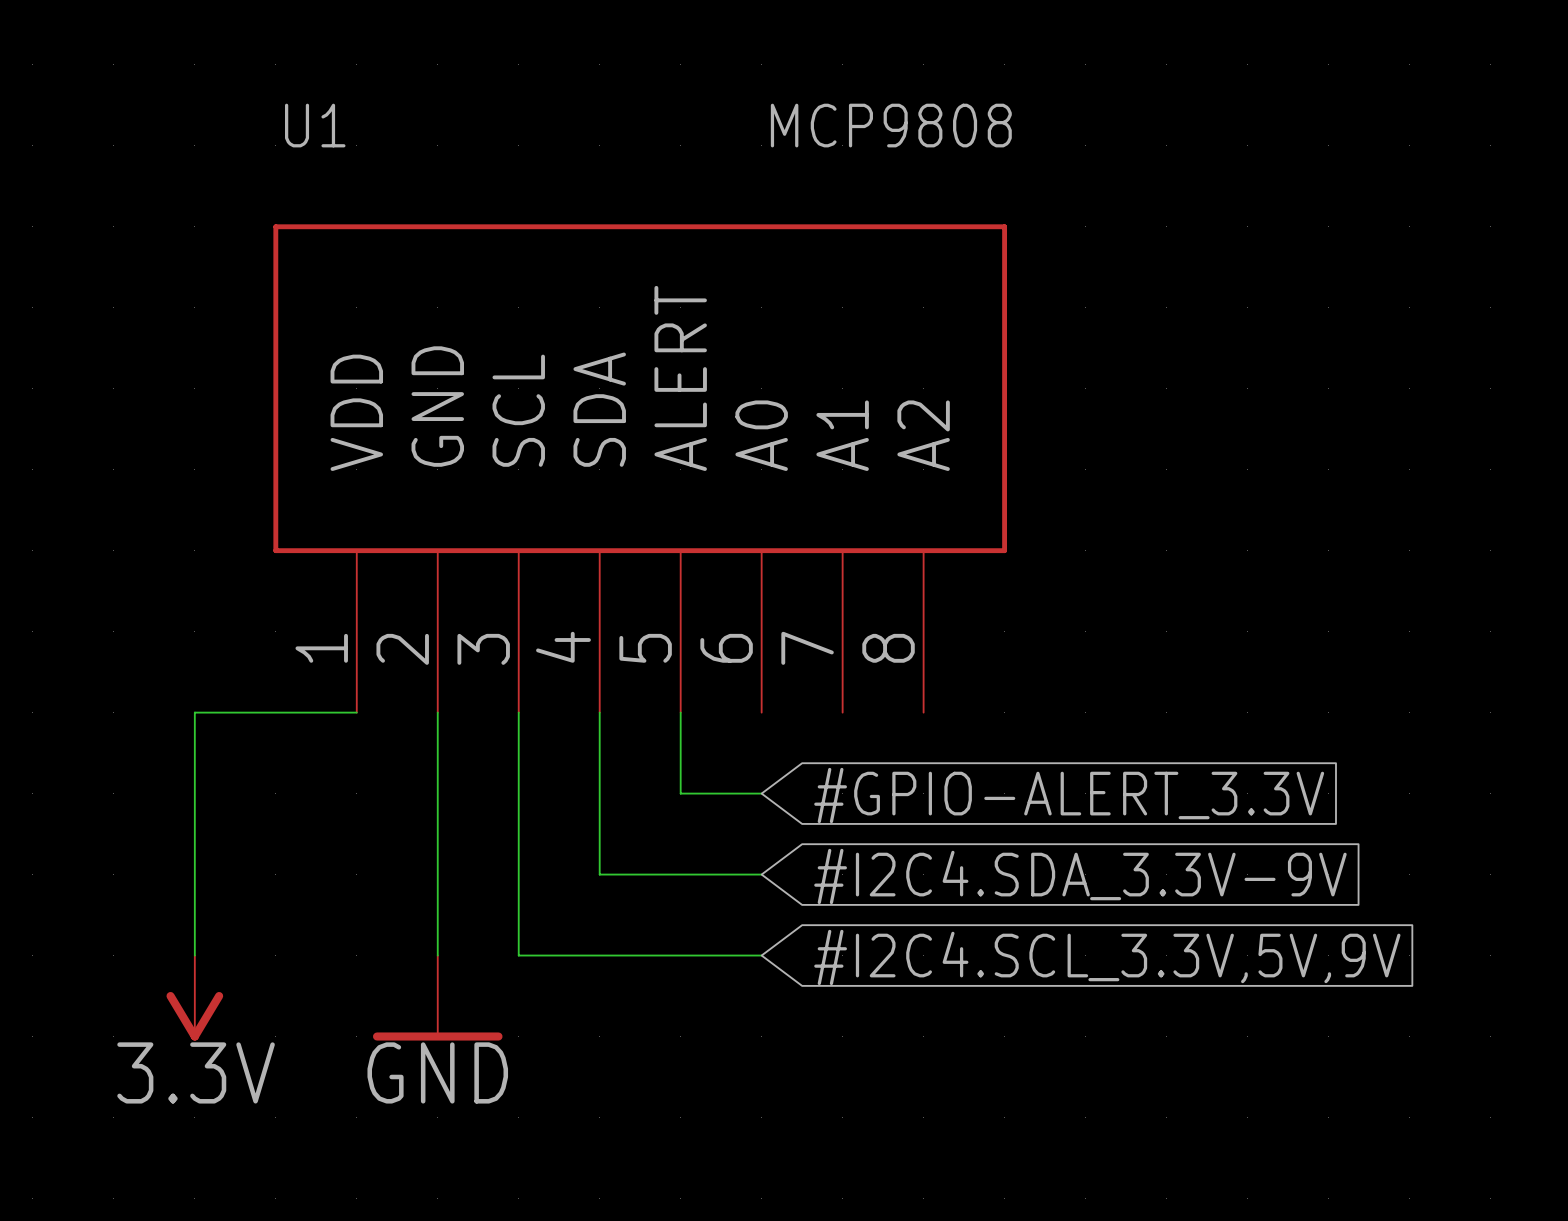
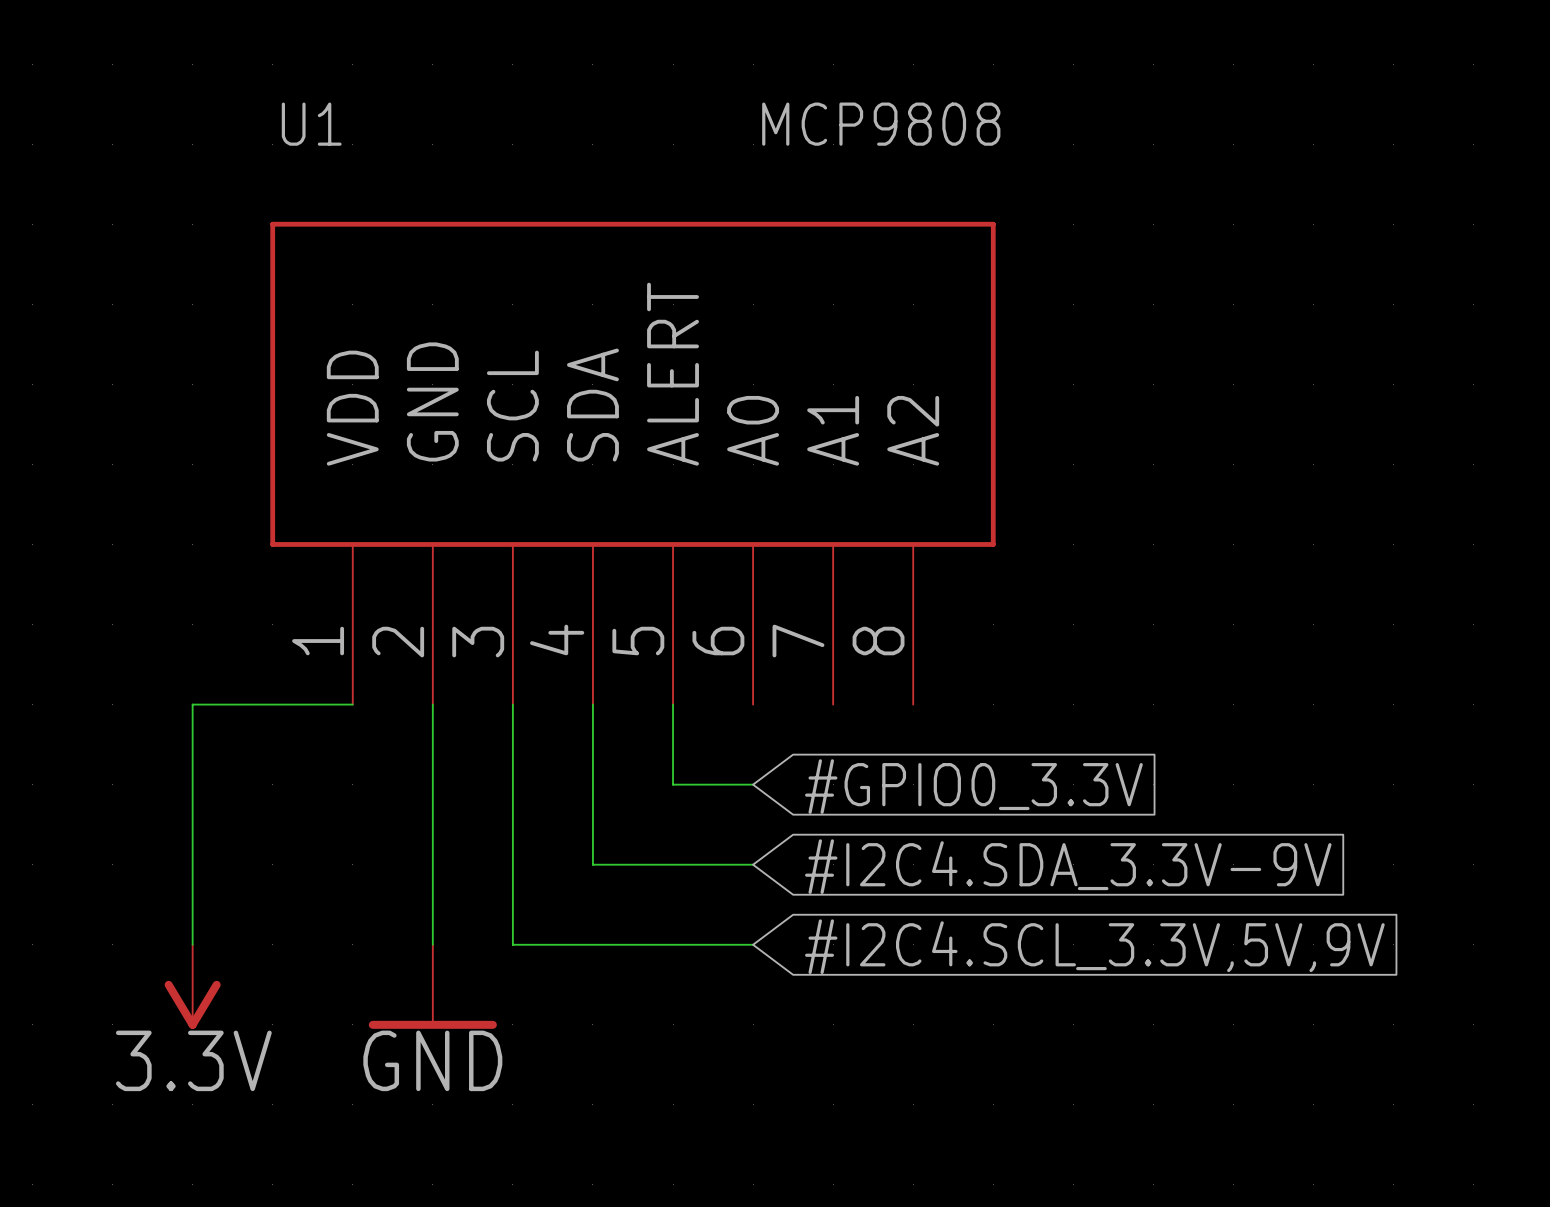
global label: #GPIO-ALERT_3.3V (1069, 795) -> #GPIO0_3.3V (973, 786)

